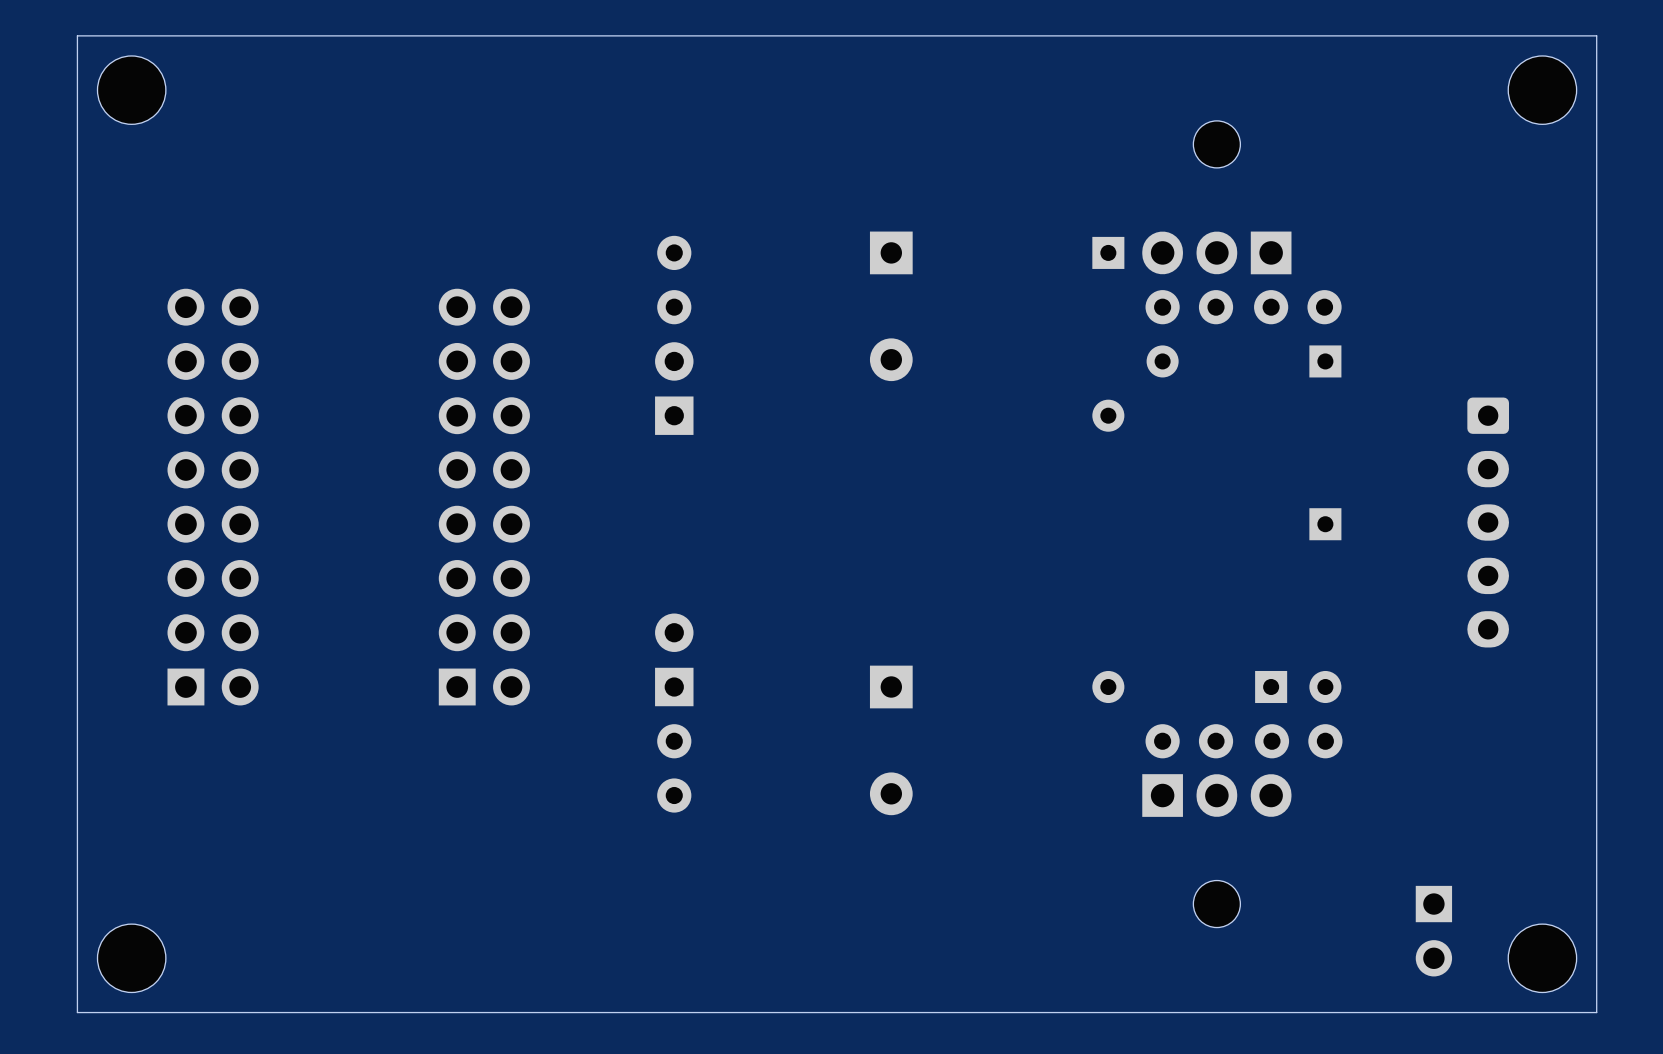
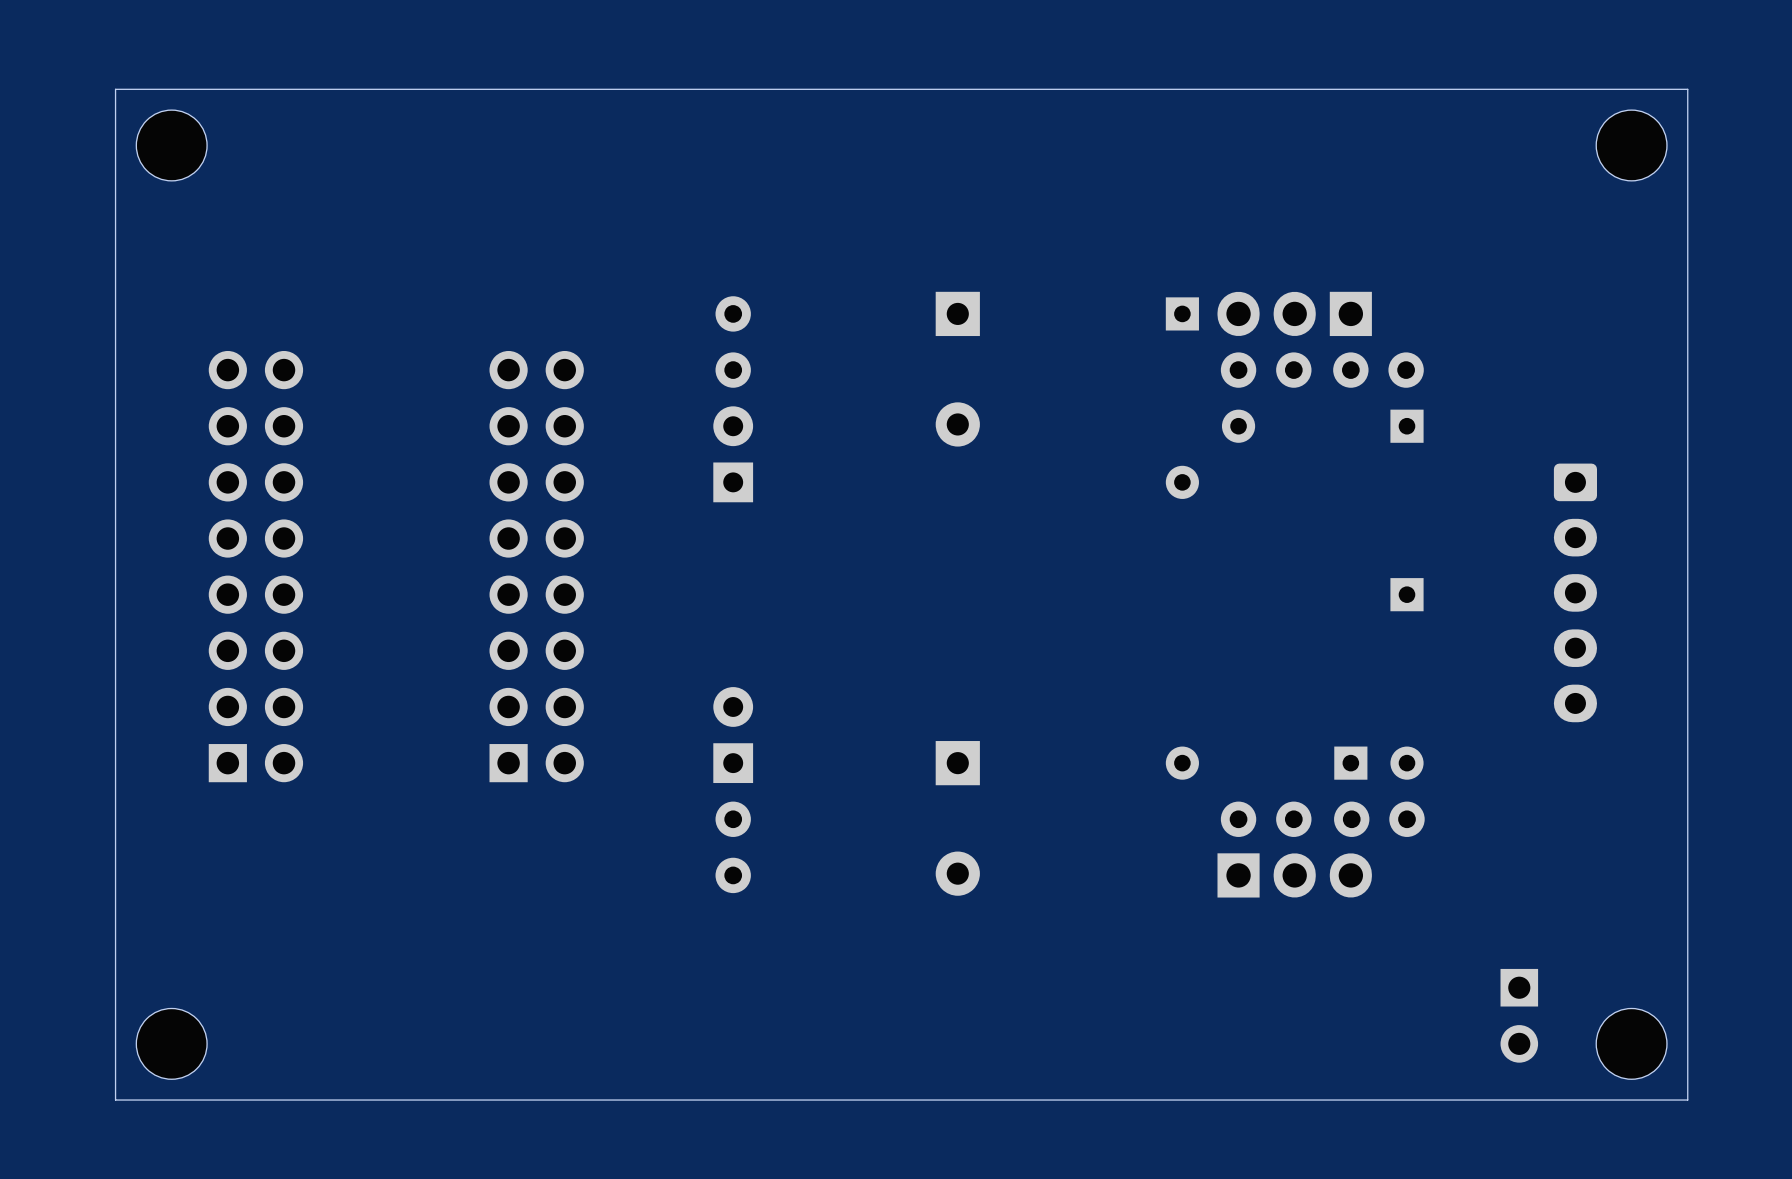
part: (1216, 144) -> none
part: (1216, 904) -> none

